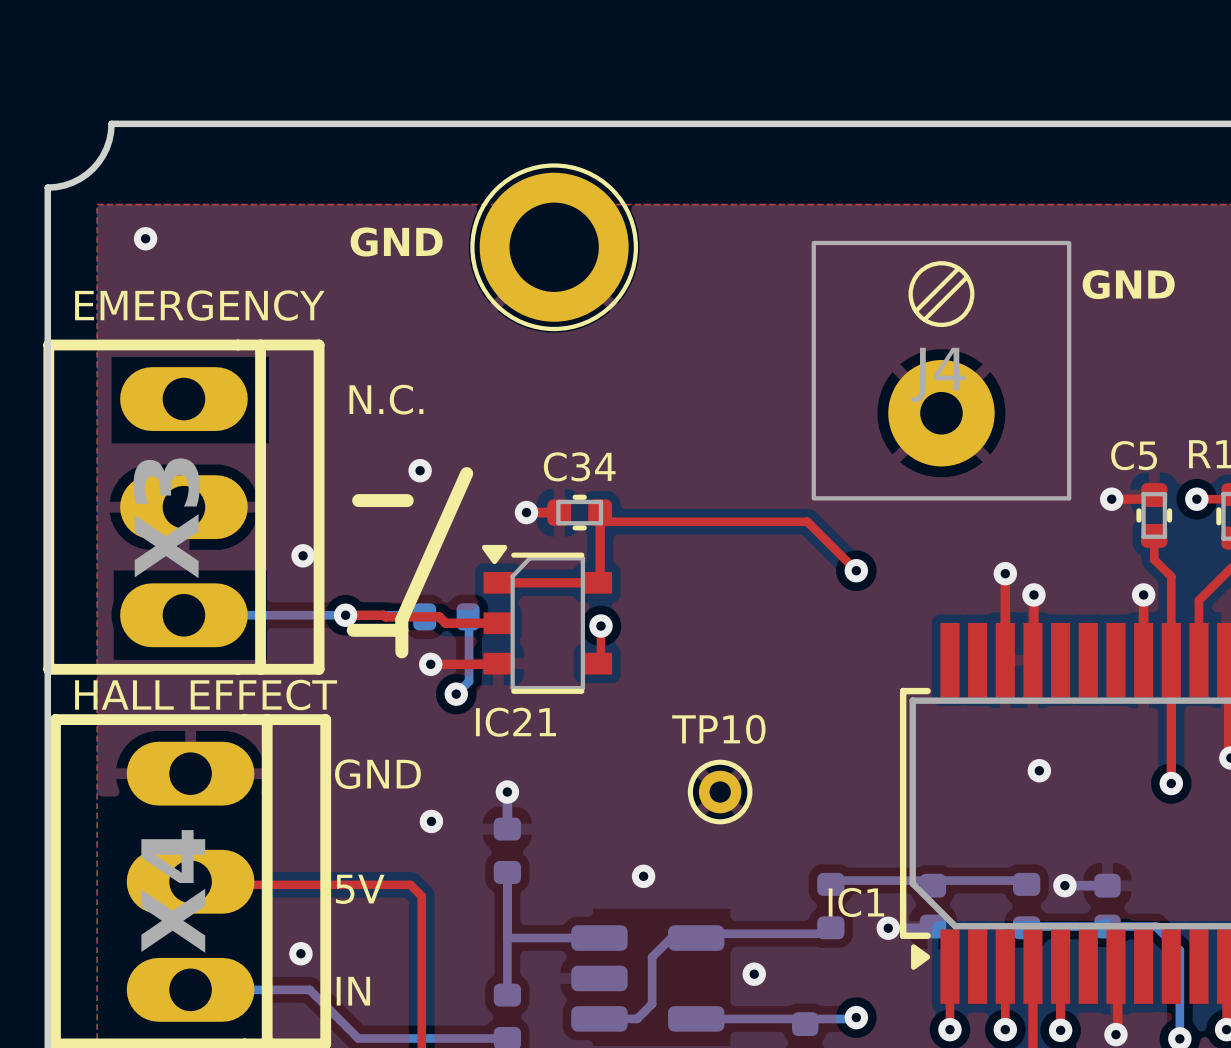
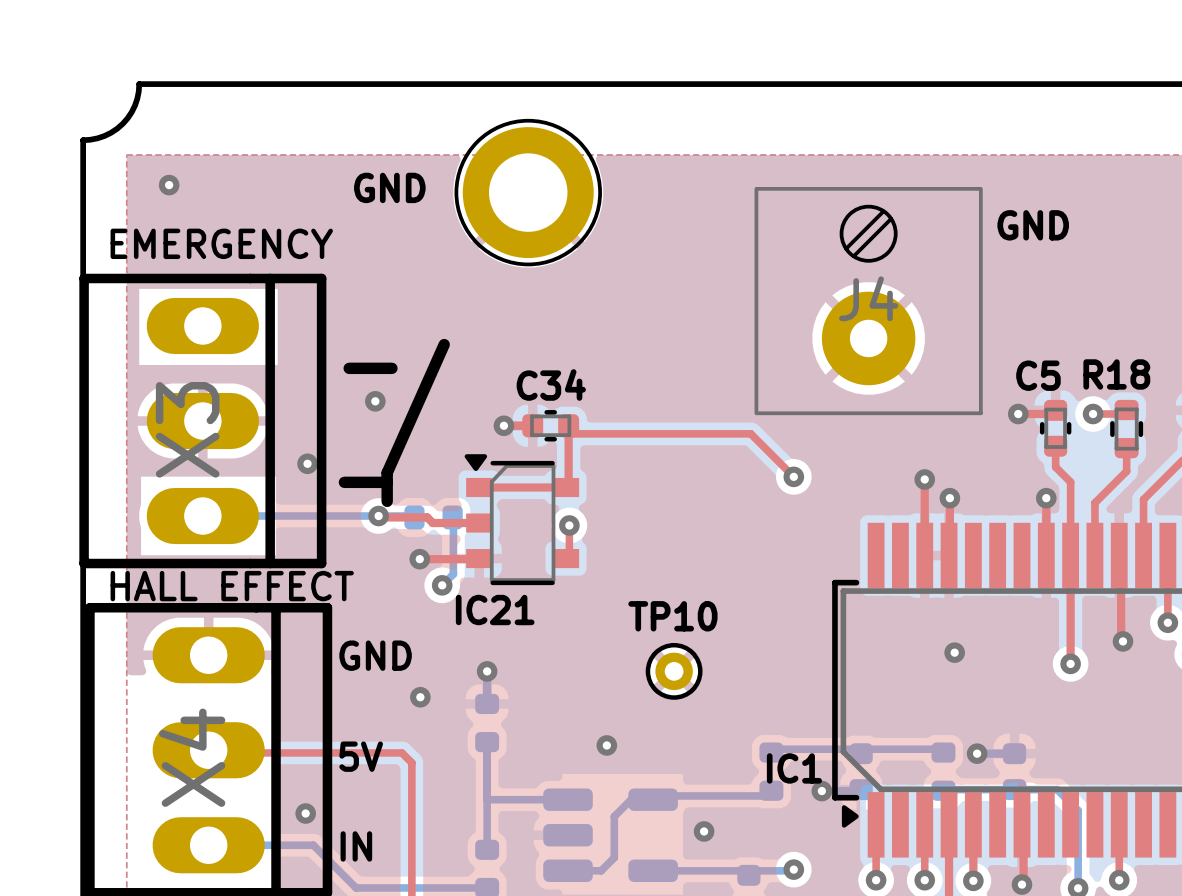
text: N.C. (386, 399) -> none
via position: (420, 470) -> (375, 401)
line: (466, 473) (401, 619) (401, 651) -> (444, 344) (387, 472) (387, 501)
line: (358, 500) (407, 500) -> (349, 368) (391, 368)
top track: (345, 615) (383, 615) -> none
via position: (345, 615) -> (378, 516)
line: (353, 630) (401, 630) -> (344, 482) (387, 482)

